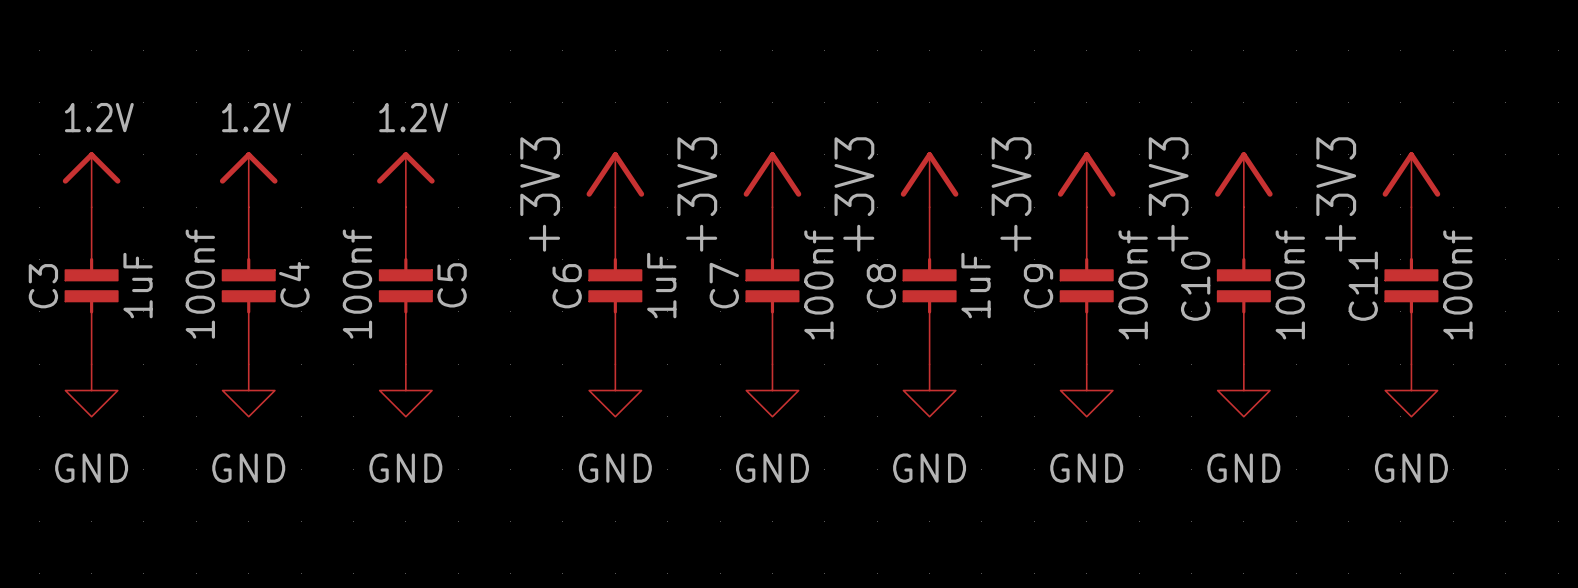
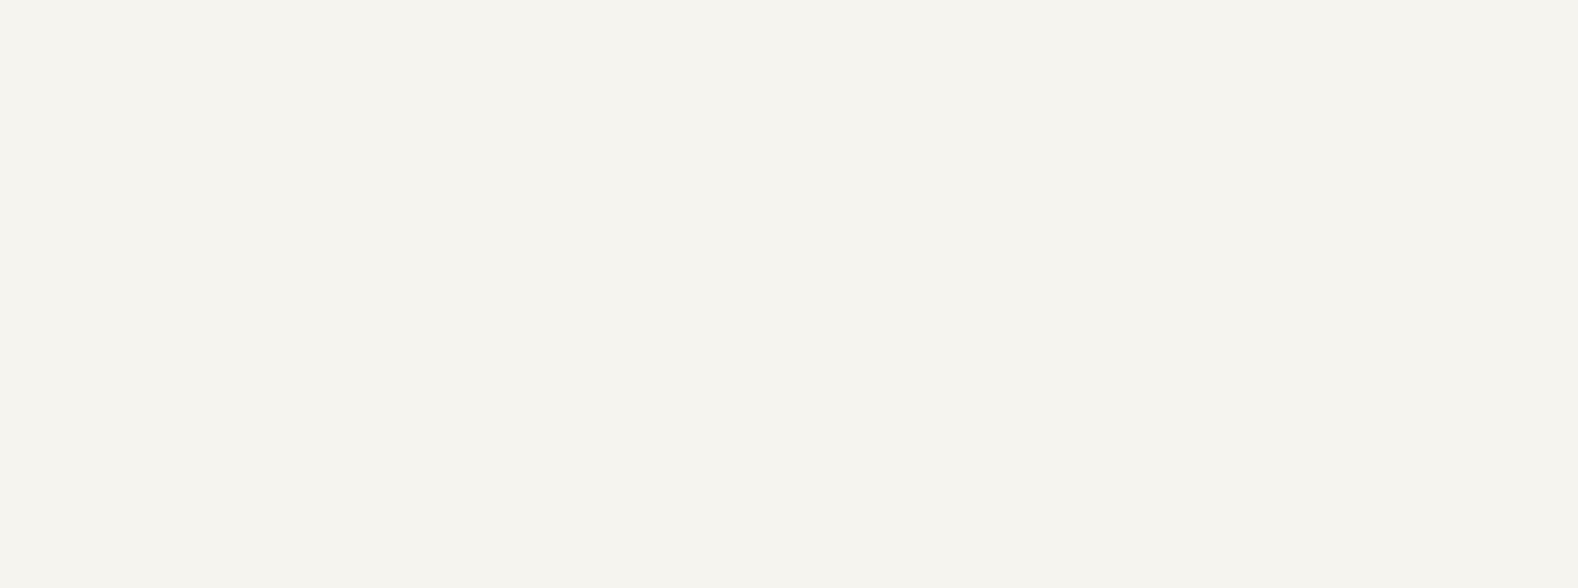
power symbol: 1.2V (91, 179) -> none
power symbol: 1.2V (248, 179) -> none
power symbol: 1.2V (405, 179) -> none
power symbol: +3V3 (615, 179) -> none
power symbol: +3V3 (772, 179) -> none
power symbol: +3V3 (929, 179) -> none
power symbol: +3V3 (1086, 179) -> none
power symbol: +3V3 (1243, 179) -> none
power symbol: +3V3 (1411, 179) -> none
C3: 1uF (91, 285) -> none
C4: 100nf (248, 285) -> none
C5: 100nf (405, 285) -> none
C6: 1uF (615, 285) -> none
C7: 100nf (772, 285) -> none
C8: 1uF (929, 285) -> none
C9: 100nf (1086, 285) -> none
C10: 100nf (1243, 285) -> none
C11: 100nf (1411, 285) -> none
power symbol: GND (91, 390) -> none
power symbol: GND (248, 390) -> none
power symbol: GND (405, 390) -> none
power symbol: GND (615, 390) -> none
power symbol: GND (772, 390) -> none
power symbol: GND (929, 390) -> none
power symbol: GND (1086, 390) -> none
power symbol: GND (1243, 390) -> none
power symbol: GND (1411, 390) -> none

